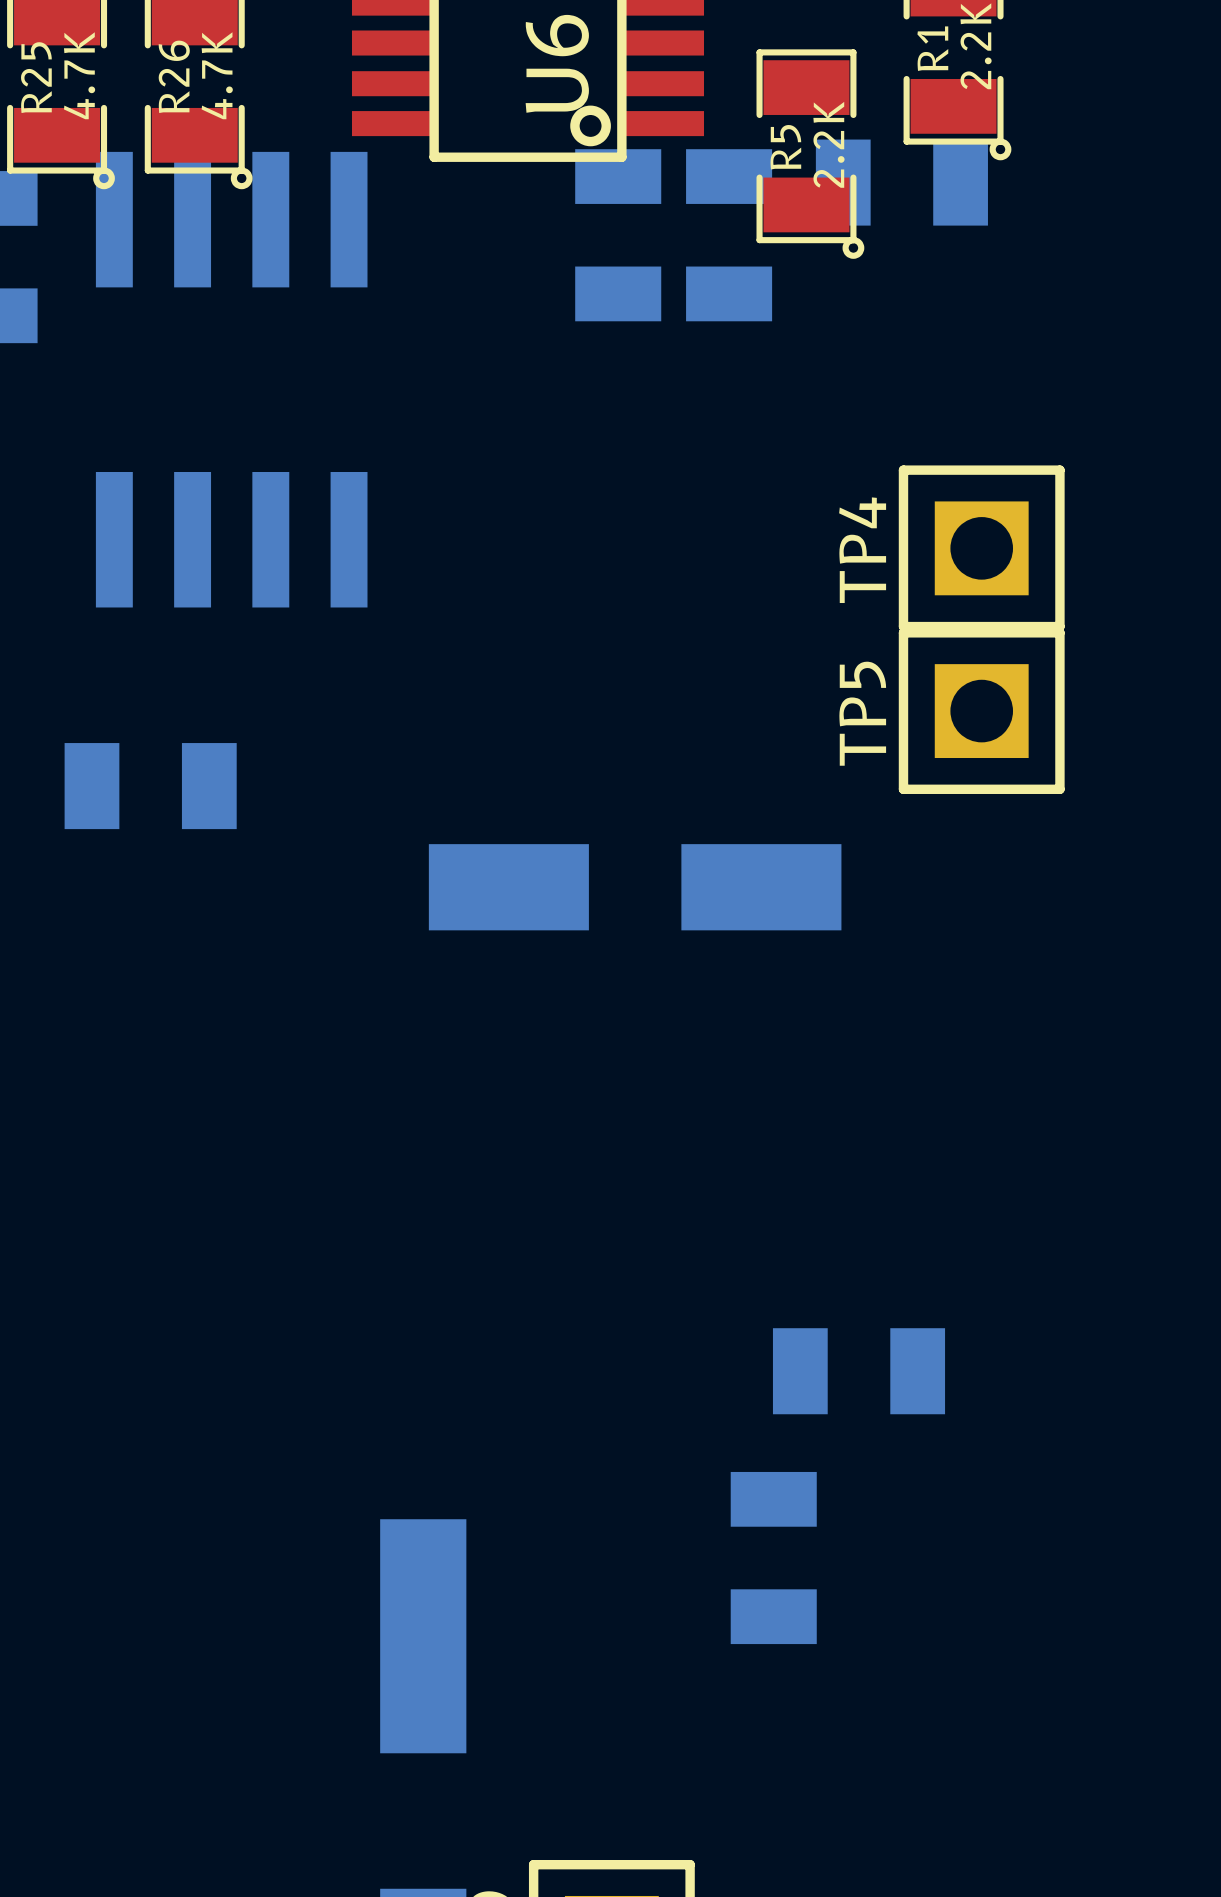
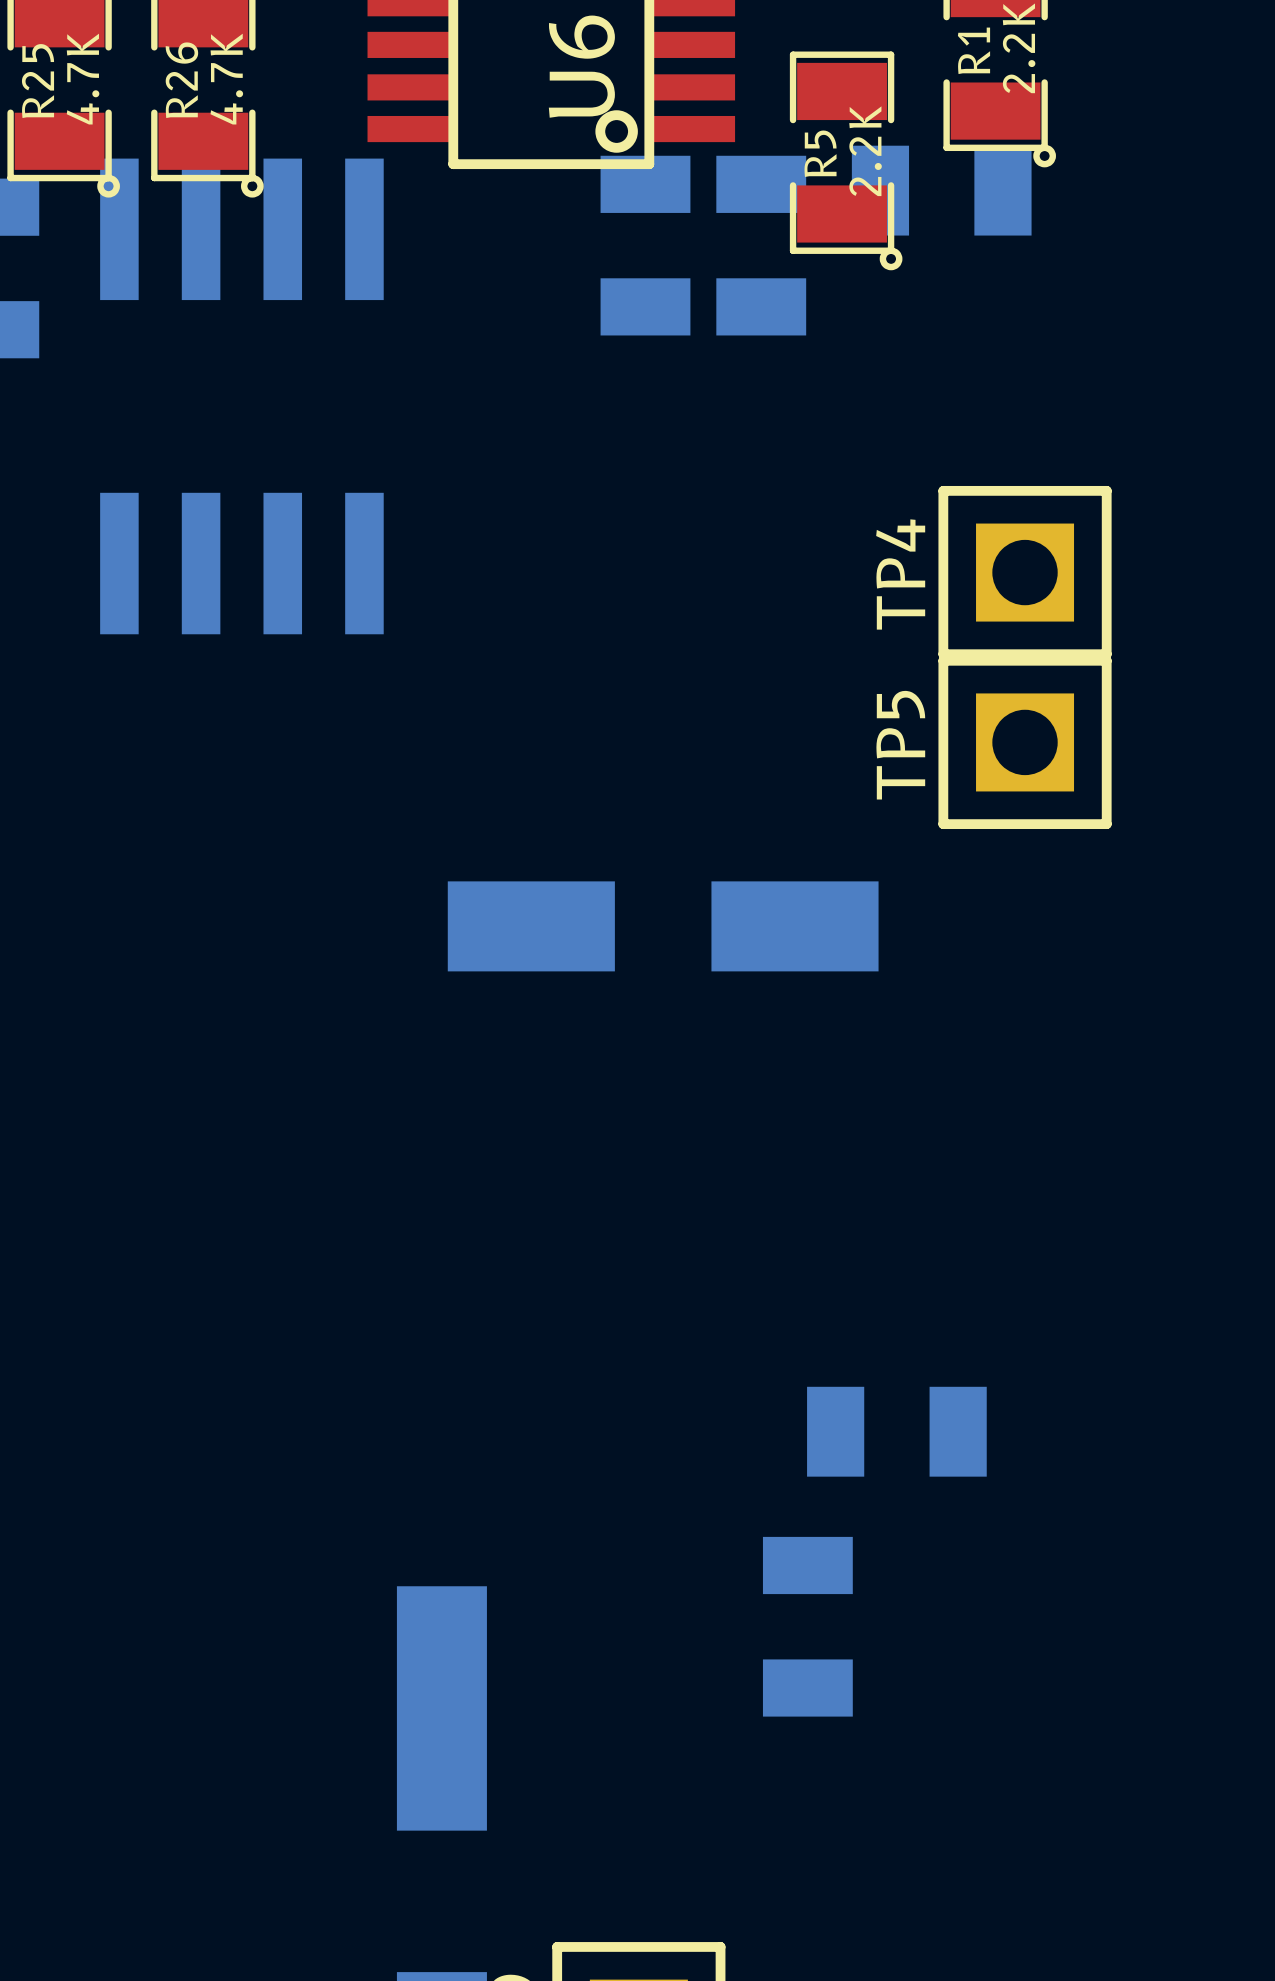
part: (150, 786) -> none

